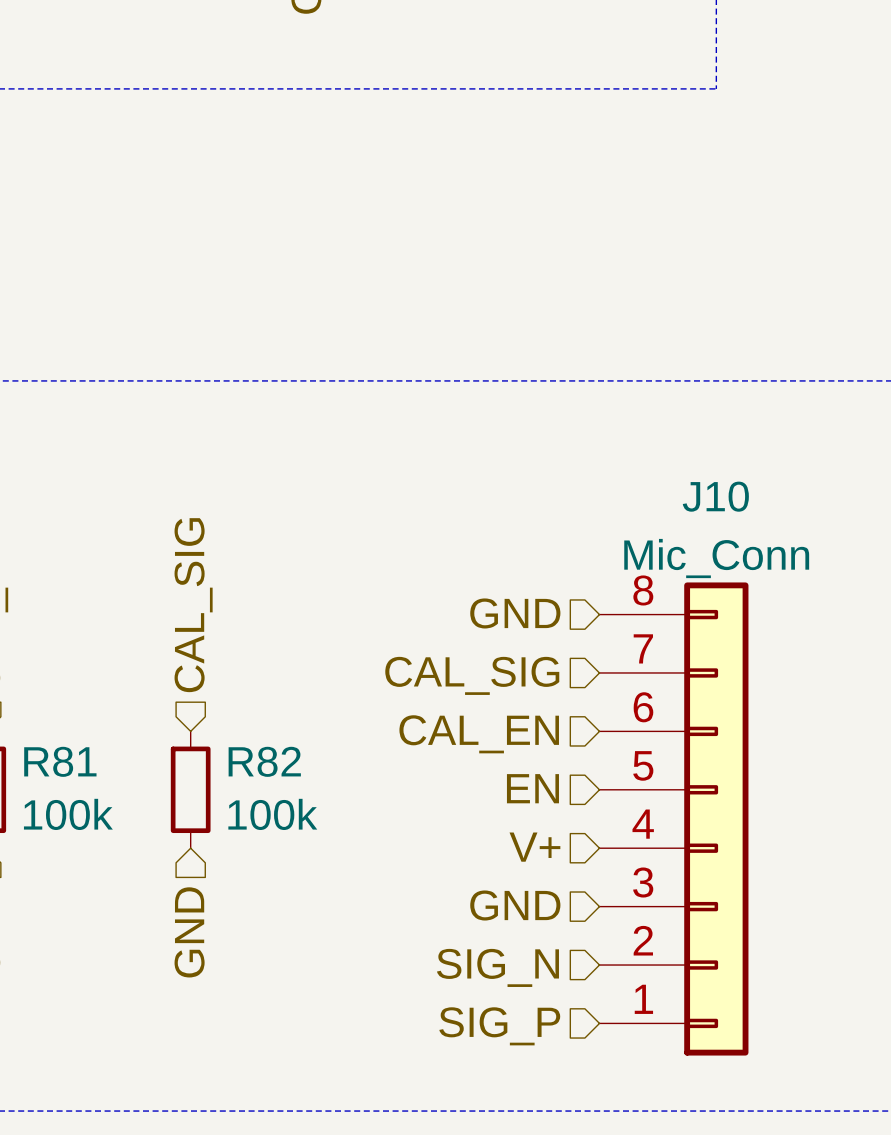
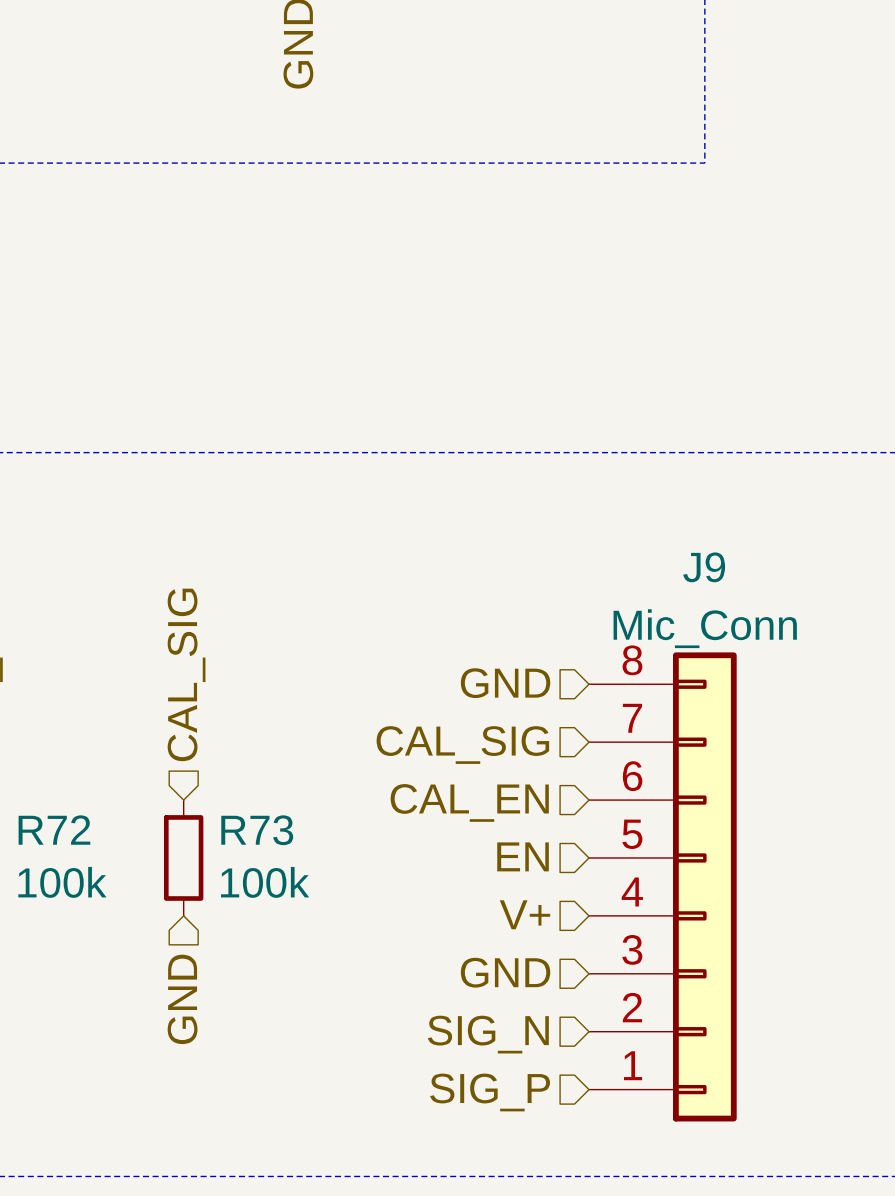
J10 name: J10 (715, 496) -> J9 (704, 567)
R81 name: R81 (60, 761) -> R72 (54, 830)
R82 name: R82 (264, 761) -> R73 (257, 830)

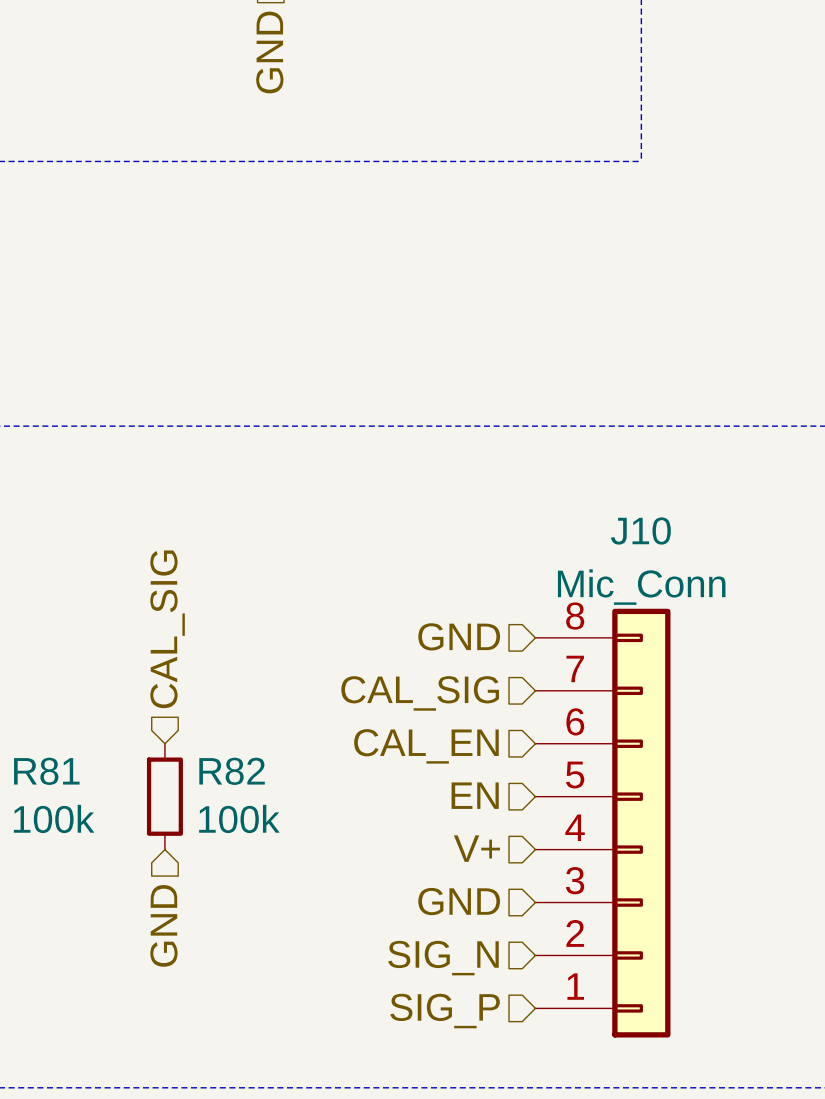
J9 name: J9 (704, 567) -> J10 (640, 531)
R72 name: R72 (54, 830) -> R81 (46, 771)
R73 name: R73 (257, 830) -> R82 (232, 771)

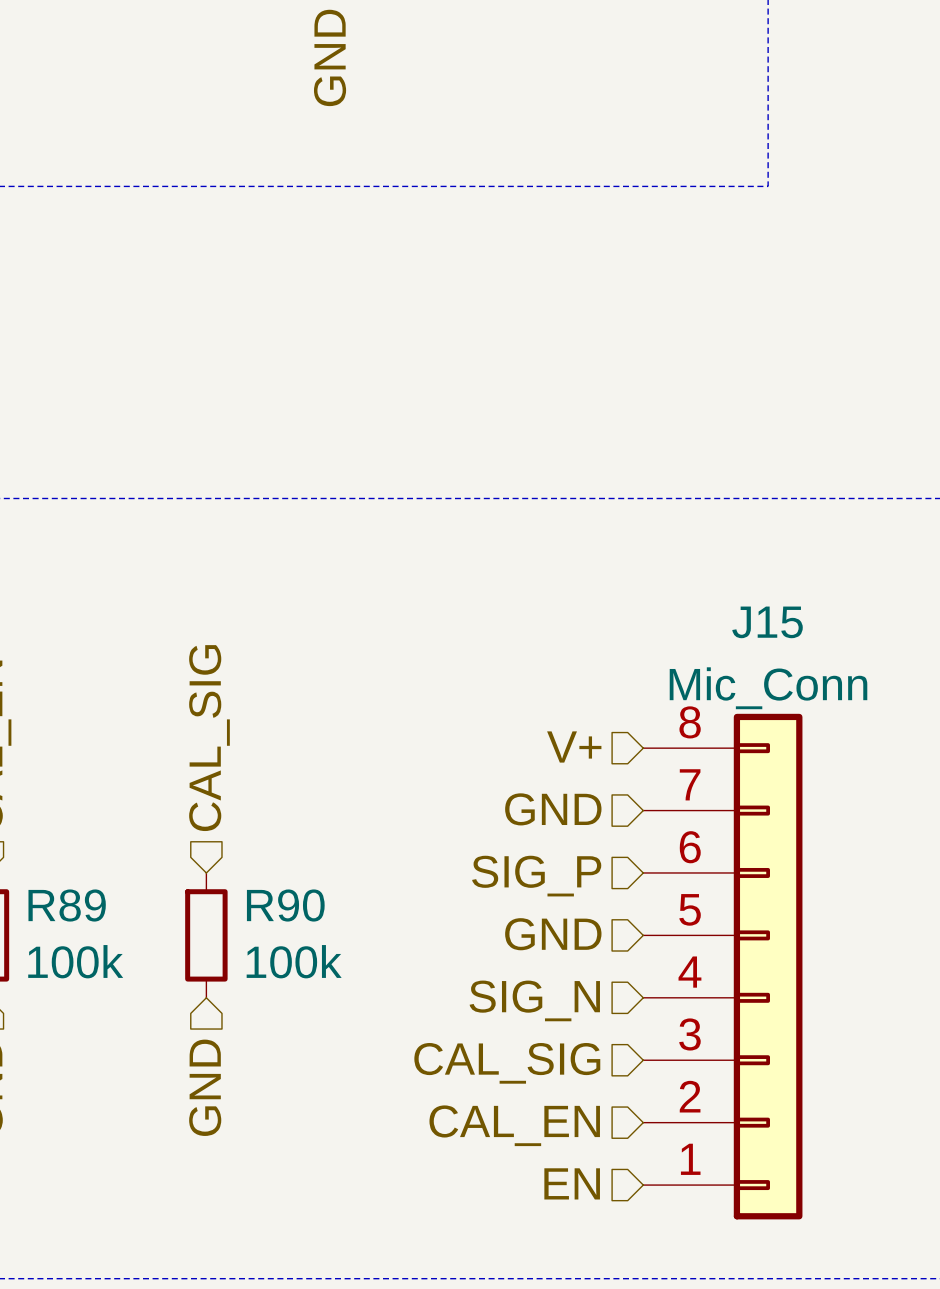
J10 name: J10 (640, 531) -> J15 (767, 622)
hierarchical label: GND (459, 636) -> V+ (574, 746)
hierarchical label: CAL_SIG (420, 693) -> GND (553, 809)
hierarchical label: CAL_EN (426, 746) -> SIG_P (536, 876)
R81 name: R81 (46, 771) -> R89 (67, 905)
R82 name: R82 (232, 771) -> R90 (285, 905)
hierarchical label: EN (475, 795) -> GND (553, 934)
hierarchical label: V+ (476, 848) -> SIG_N (534, 1000)
hierarchical label: GND (459, 901) -> CAL_SIG (507, 1063)
hierarchical label: SIG_N (443, 958) -> CAL_EN (514, 1125)
hierarchical label: SIG_P (445, 1011) -> EN (572, 1183)

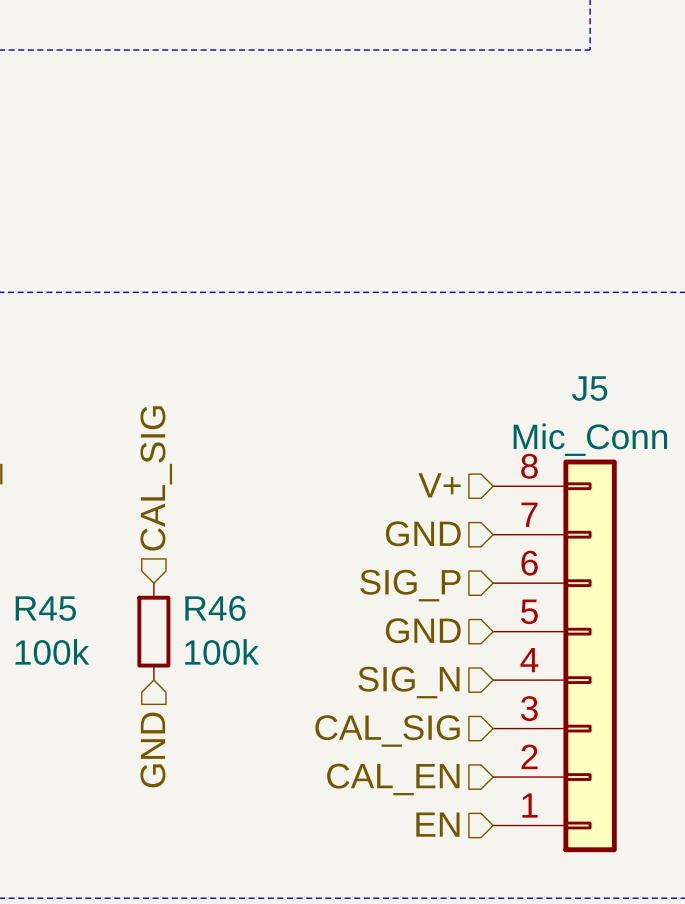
J15 name: J15 (767, 622) -> J5 (589, 388)
R89 name: R89 (67, 905) -> R45 (45, 608)
R90 name: R90 (285, 905) -> R46 (215, 608)

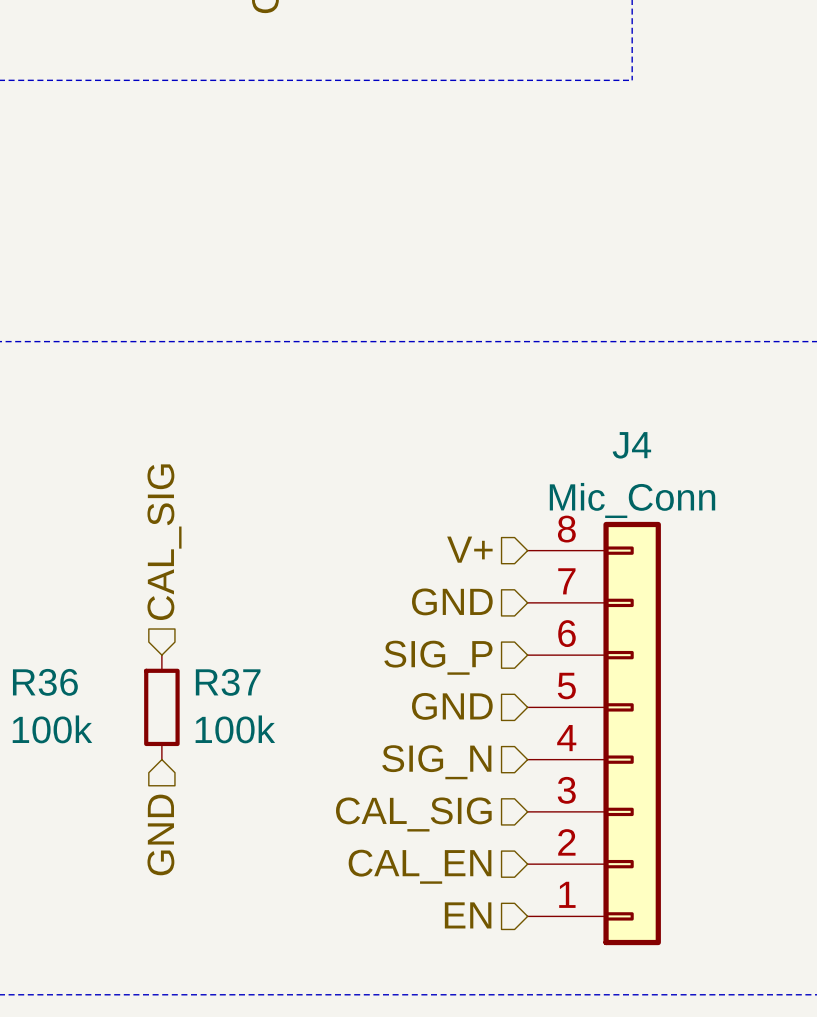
J5 name: J5 (589, 388) -> J4 (631, 445)
R45 name: R45 (45, 608) -> R36 (45, 682)
R46 name: R46 (215, 608) -> R37 (228, 682)

